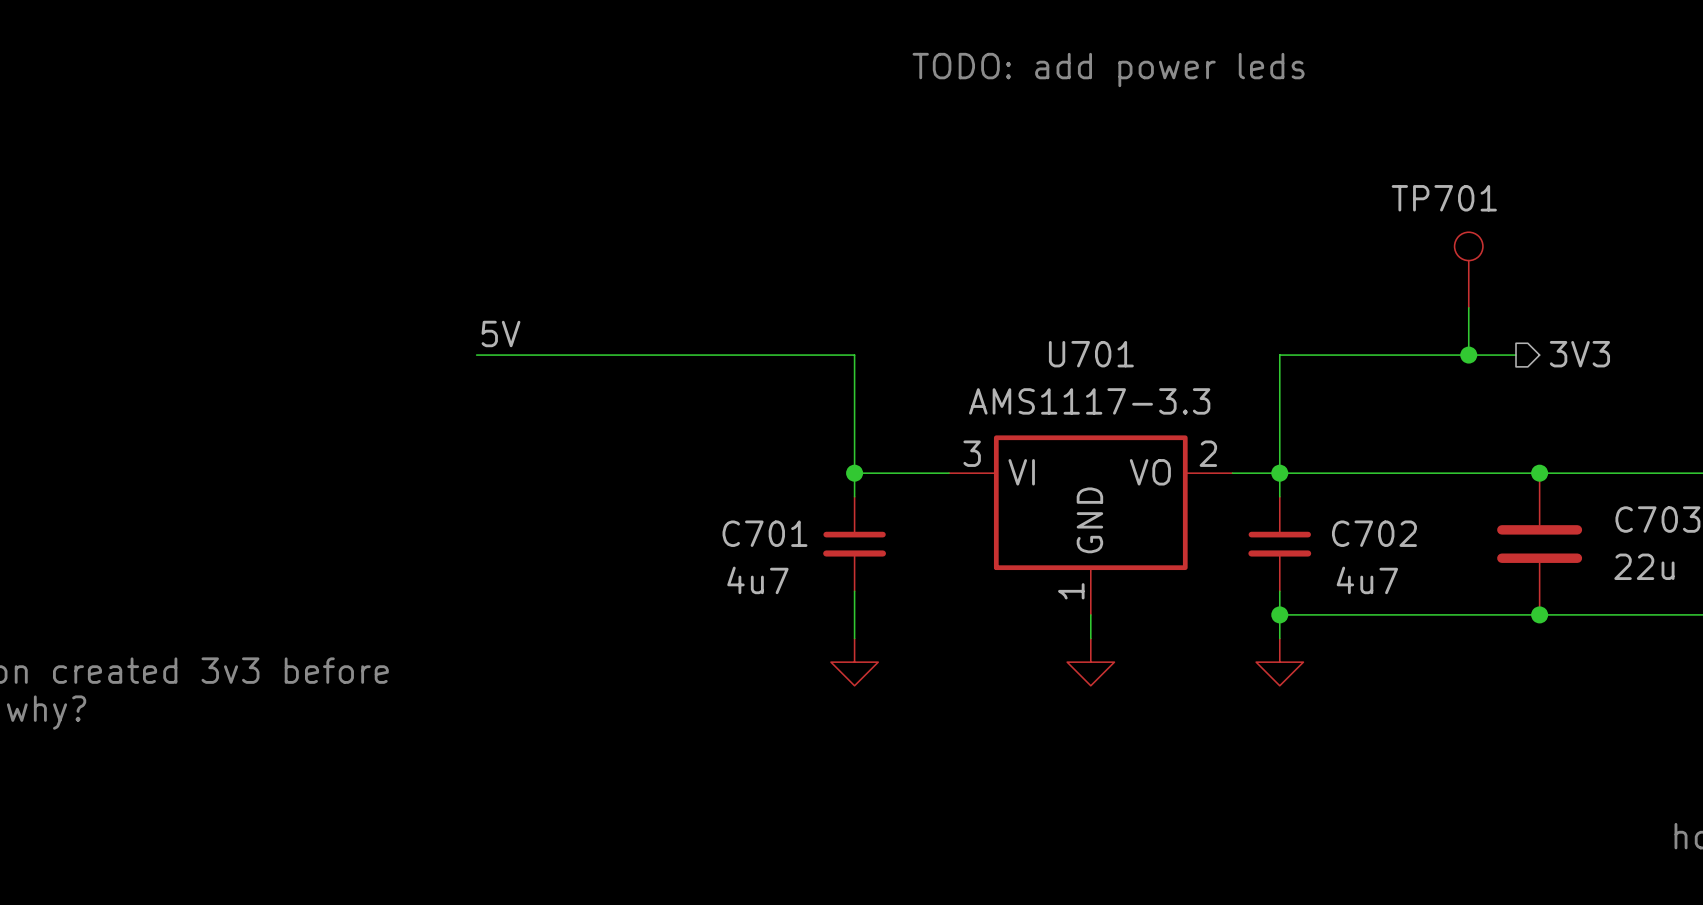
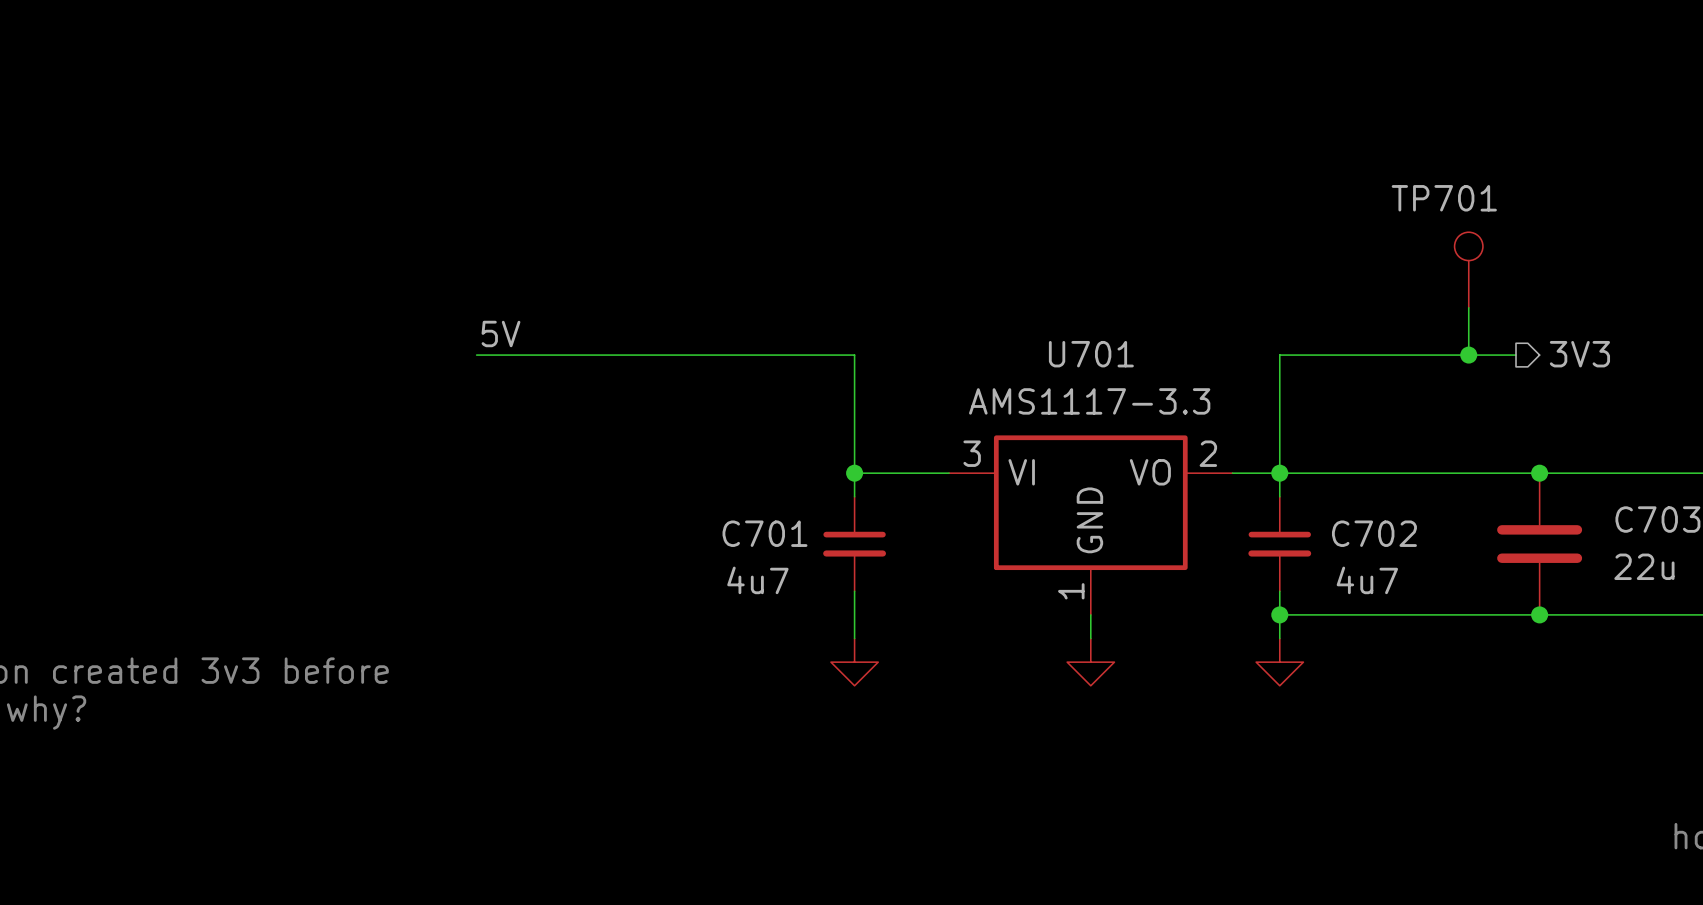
text: TODO: add power leds (1108, 70) -> none

